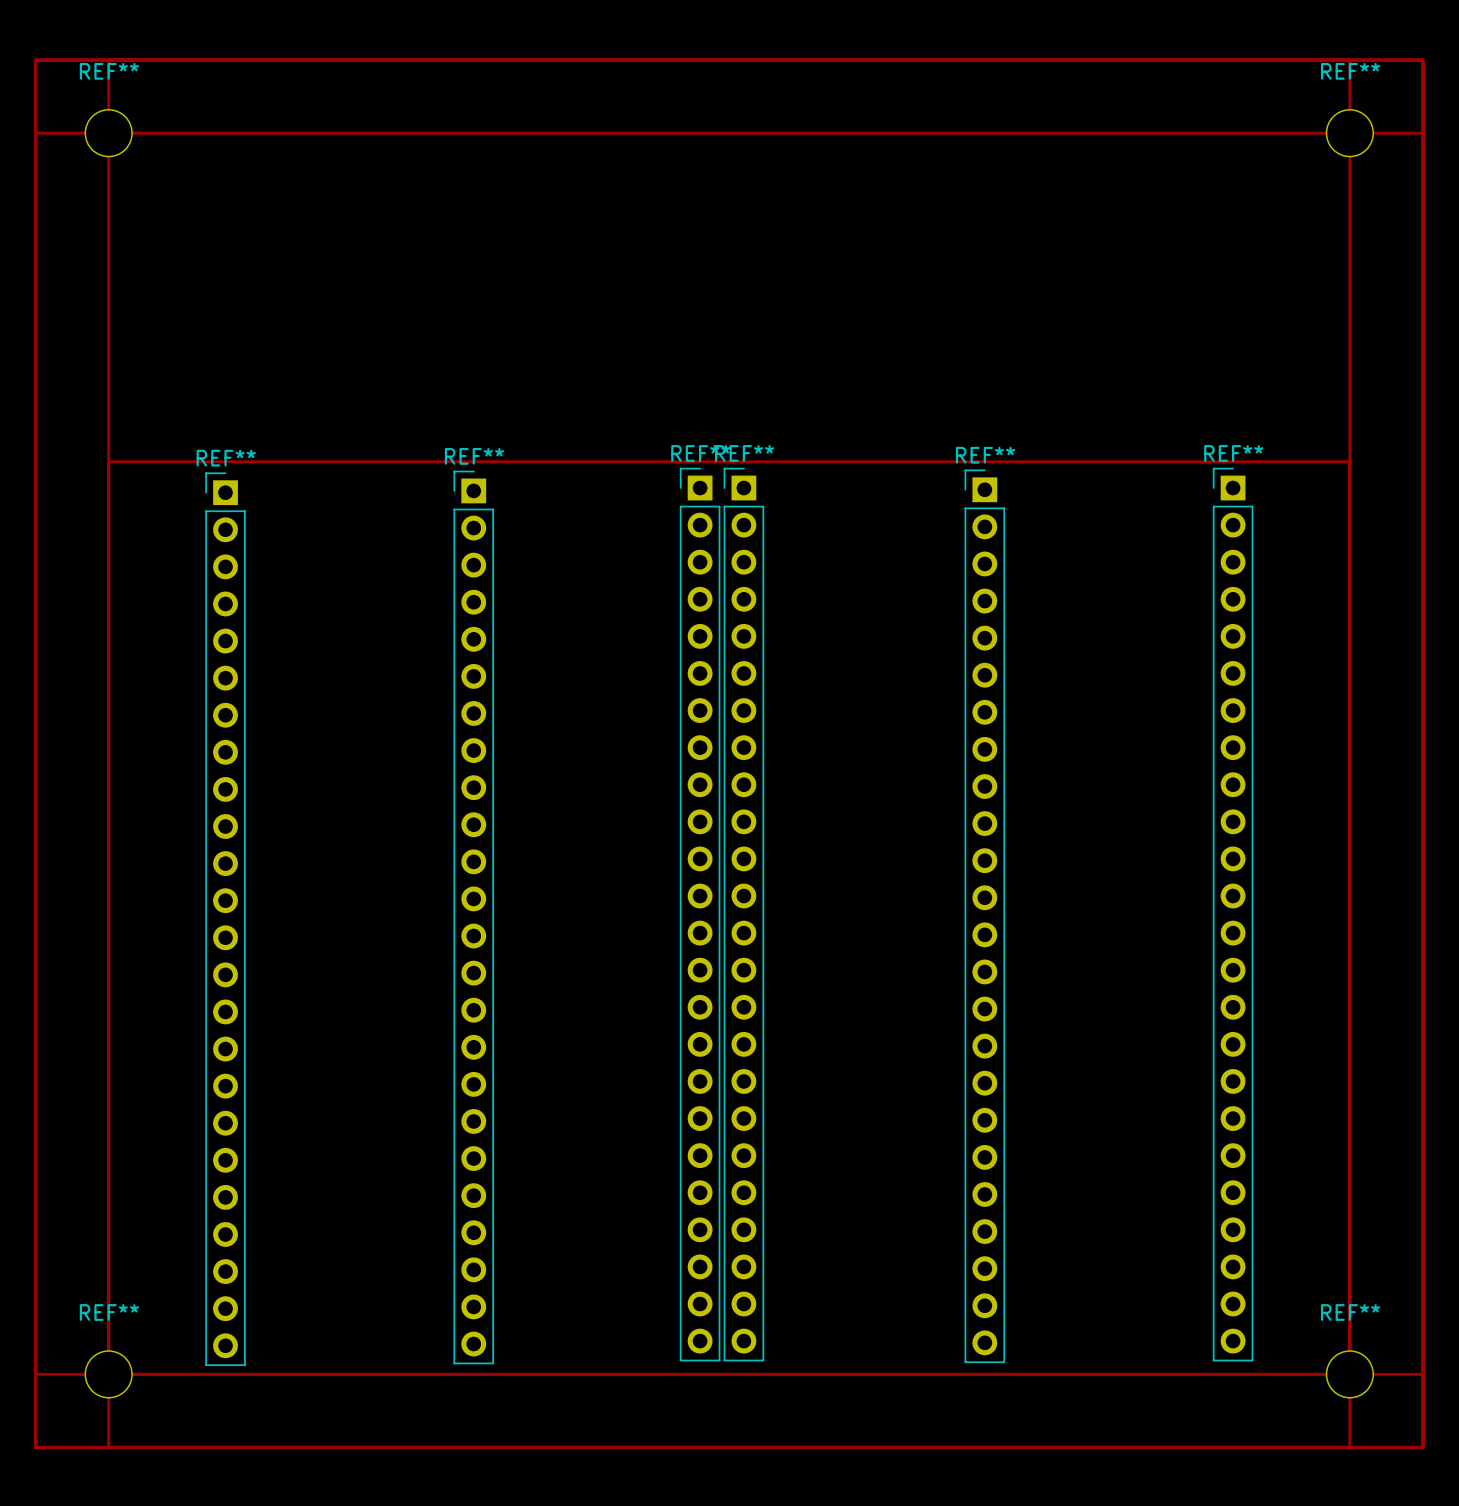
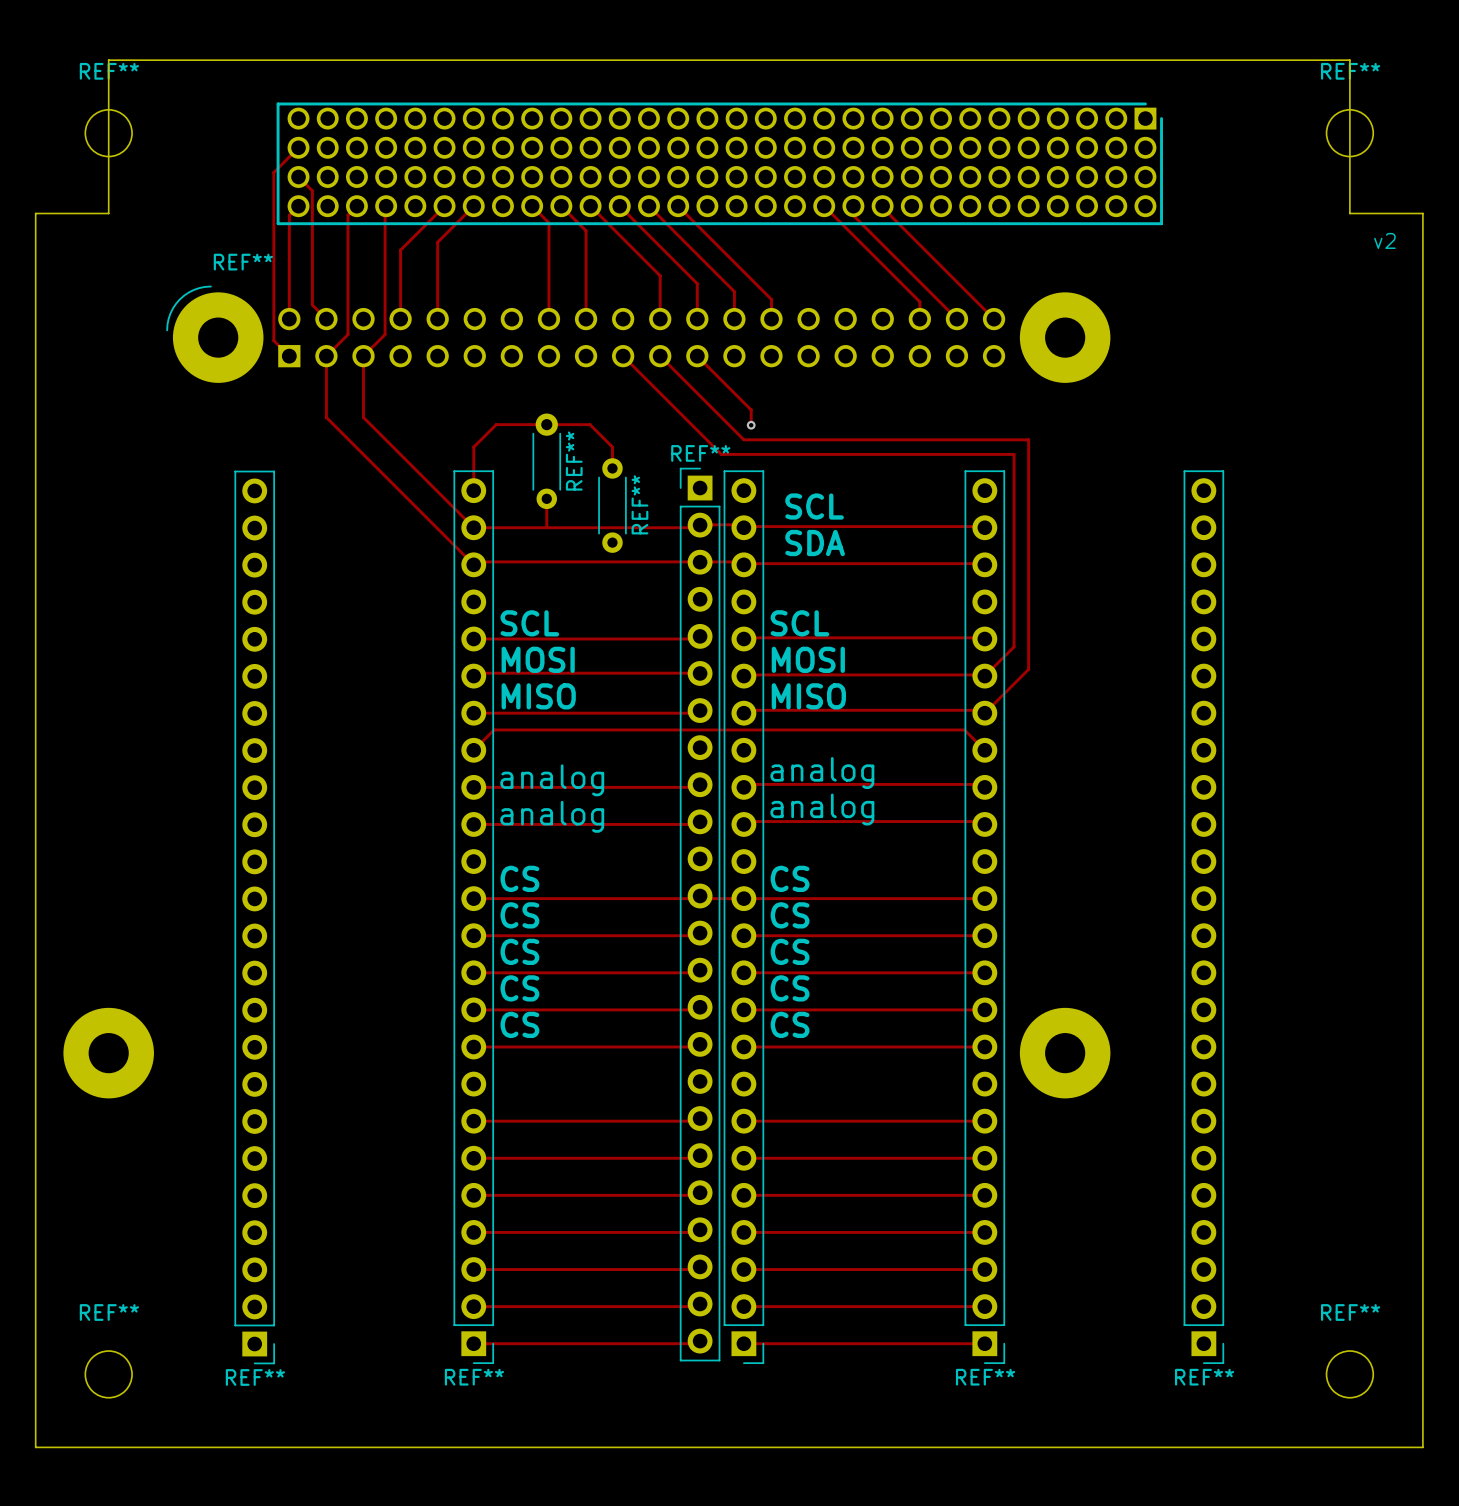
top track: (35, 60) (1422, 60) (1422, 1447) (35, 1447) (35, 60) -> none
top track: (108, 60) (108, 1447) -> none
board edge: none -> (108, 60) (1349, 60) (1349, 213) (1422, 213) (1422, 1447) (35, 1447) (35, 213) (108, 213) (108, 60)
top track: (1349, 60) (1349, 1447) -> none
top track: (35, 133) (1422, 133) -> none
top track: none -> (298, 147) (273, 172) (273, 340) (289, 356)
part: none -> (719, 163)
top track: none -> (298, 176) (312, 190) (312, 305) (326, 319)
top track: none -> (298, 206) (289, 215) (289, 319)
top track: none -> (356, 206) (348, 215) (348, 334) (326, 356) (326, 417) (473, 564) (476, 561) (984, 563)
top track: none -> (386, 206) (385, 334) (363, 356) (363, 417) (473, 527) (697, 527) (700, 524) (984, 526)
top track: none -> (444, 206) (400, 250) (400, 319)
top track: none -> (473, 206) (437, 242) (437, 319)
top track: none -> (532, 206) (548, 222) (548, 319)
top track: none -> (561, 206) (586, 230) (586, 319)
top track: none -> (590, 206) (660, 275) (660, 319)
top track: none -> (619, 206) (697, 283) (697, 319)
top track: none -> (648, 206) (734, 291) (734, 319)
top track: none -> (678, 206) (771, 299) (771, 319)
top track: none -> (824, 206) (919, 301) (919, 319)
top track: none -> (853, 206) (853, 215) (956, 319)
top track: none -> (882, 206) (994, 319)
text: none -> v2 (1384, 240)
top track: none -> (623, 356) (721, 454) (1014, 454) (1014, 646) (984, 676)
top track: none -> (660, 356) (743, 439) (1028, 439) (1028, 669) (984, 713)
top track: none -> (697, 356) (751, 410) (751, 425)
via: none -> (751, 425)
top track: (108, 461) (1349, 461) -> none
REF**: none -> (546, 461)
top track: none -> (612, 468) (612, 447) (589, 424) (496, 424) (473, 447) (473, 490)
top track: none -> (546, 498) (546, 527)
REF**: none -> (612, 505)
text: none -> SCL (814, 506)
text: none -> SDA (815, 543)
text: none -> SCL (529, 623)
text: none -> SCL (799, 623)
top track: none -> (700, 636) (697, 639) (473, 639)
top track: none -> (752, 637) (750, 636) (743, 636) (745, 637) (984, 637)
text: none -> MOSI (538, 659)
text: none -> MOSI (808, 659)
top track: none -> (700, 673) (476, 673) (473, 676)
top track: none -> (743, 673) (745, 674) (984, 674)
REF**: none -> (638, 691)
text: none -> MISO (538, 696)
text: none -> MISO (808, 696)
top track: none -> (700, 710) (697, 713) (473, 713)
top track: none -> (743, 710) (983, 710) (984, 712)
top track: none -> (473, 750) (494, 729) (964, 729) (984, 750)
text: none -> analog (822, 773)
text: none -> analog (552, 780)
top track: none -> (700, 784) (697, 787) (473, 787)
top track: none -> (743, 784) (983, 784) (984, 786)
text: none -> analog (822, 809)
text: none -> analog (552, 816)
top track: none -> (700, 821) (697, 824) (473, 824)
top track: none -> (743, 821) (983, 821) (984, 823)
text: none -> CS (519, 878)
text: none -> CS (790, 878)
top track: none -> (473, 898) (984, 898)
REF**: (743, 914) -> none
REF** rotation: 0° (1233, 914) -> 180° (1203, 917)
text: none -> CS (519, 915)
text: none -> CS (790, 915)
REF** rotation: 0° (984, 916) -> 180° (984, 917)
REF** rotation: 0° (473, 917) -> 180° (473, 917)
part: none -> (743, 917)
REF** rotation: 0° (225, 919) -> 180° (254, 917)
top track: none -> (473, 935) (700, 935)
top track: none -> (743, 935) (984, 935)
text: none -> CS (519, 951)
text: none -> CS (790, 951)
top track: none -> (473, 972) (700, 972)
top track: none -> (743, 972) (984, 972)
text: none -> CS (519, 988)
text: none -> CS (790, 988)
top track: none -> (473, 1009) (700, 1009)
top track: none -> (743, 1009) (984, 1009)
text: none -> CS (519, 1024)
text: none -> CS (790, 1024)
top track: none -> (473, 1046) (700, 1046)
top track: none -> (743, 1046) (984, 1046)
part: none -> (108, 1053)
top track: none -> (473, 1121) (700, 1121)
top track: none -> (743, 1121) (984, 1121)
top track: none -> (473, 1158) (700, 1158)
top track: none -> (743, 1158) (984, 1158)
top track: none -> (473, 1195) (700, 1195)
top track: none -> (743, 1195) (984, 1195)
top track: none -> (473, 1232) (700, 1232)
top track: none -> (743, 1232) (984, 1232)
top track: none -> (473, 1269) (700, 1269)
top track: none -> (743, 1269) (984, 1269)
top track: none -> (473, 1306) (700, 1306)
top track: none -> (743, 1306) (984, 1306)
top track: none -> (473, 1343) (700, 1343)
top track: none -> (743, 1343) (984, 1343)
top track: (35, 1374) (1422, 1374) -> none

